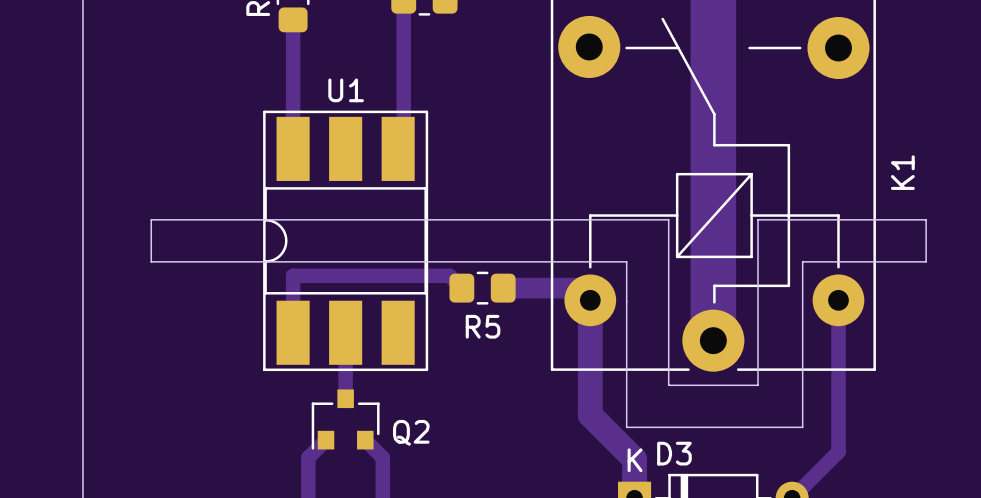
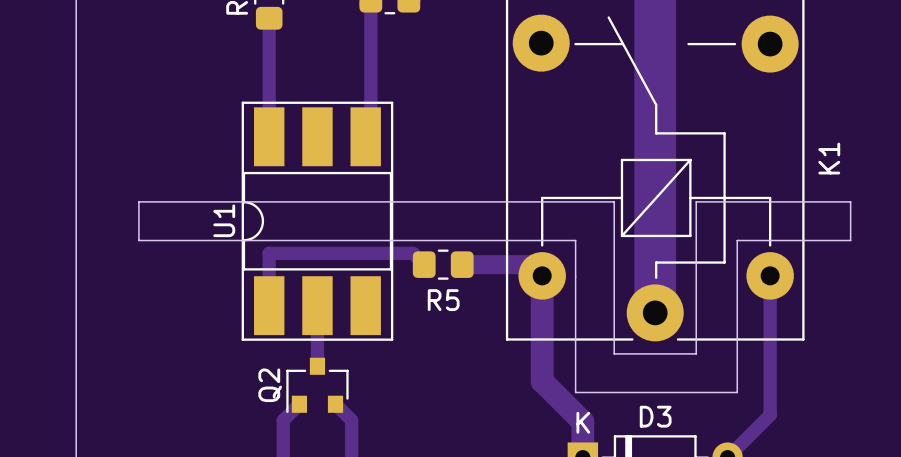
U1 name rotation: 0° (346, 90) -> 90° counterclockwise (224, 220)
U1 name position: U1 (346, 90) -> U1 (224, 220)
Q2 name rotation: 0° (411, 432) -> 90° counterclockwise (270, 385)
Q2 name position: Q2 (411, 432) -> Q2 (270, 385)
D3 name position: D3 (674, 453) -> D3 (655, 416)

